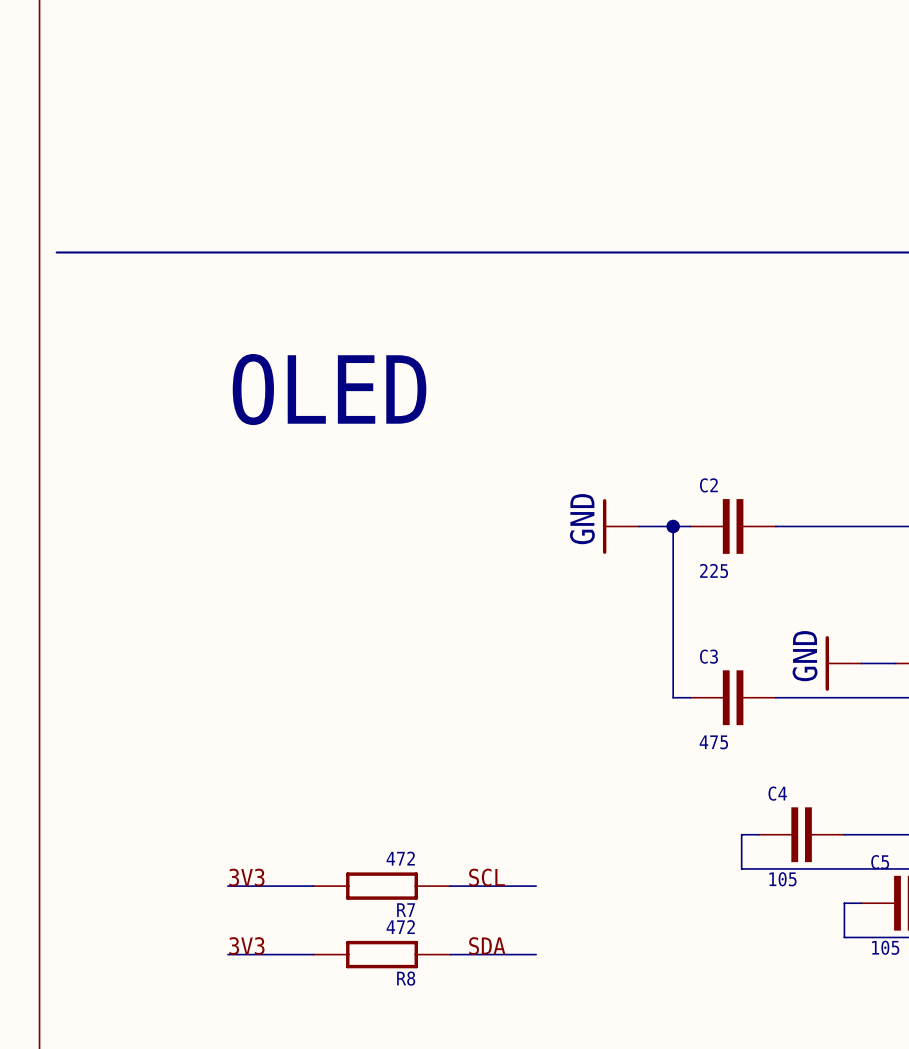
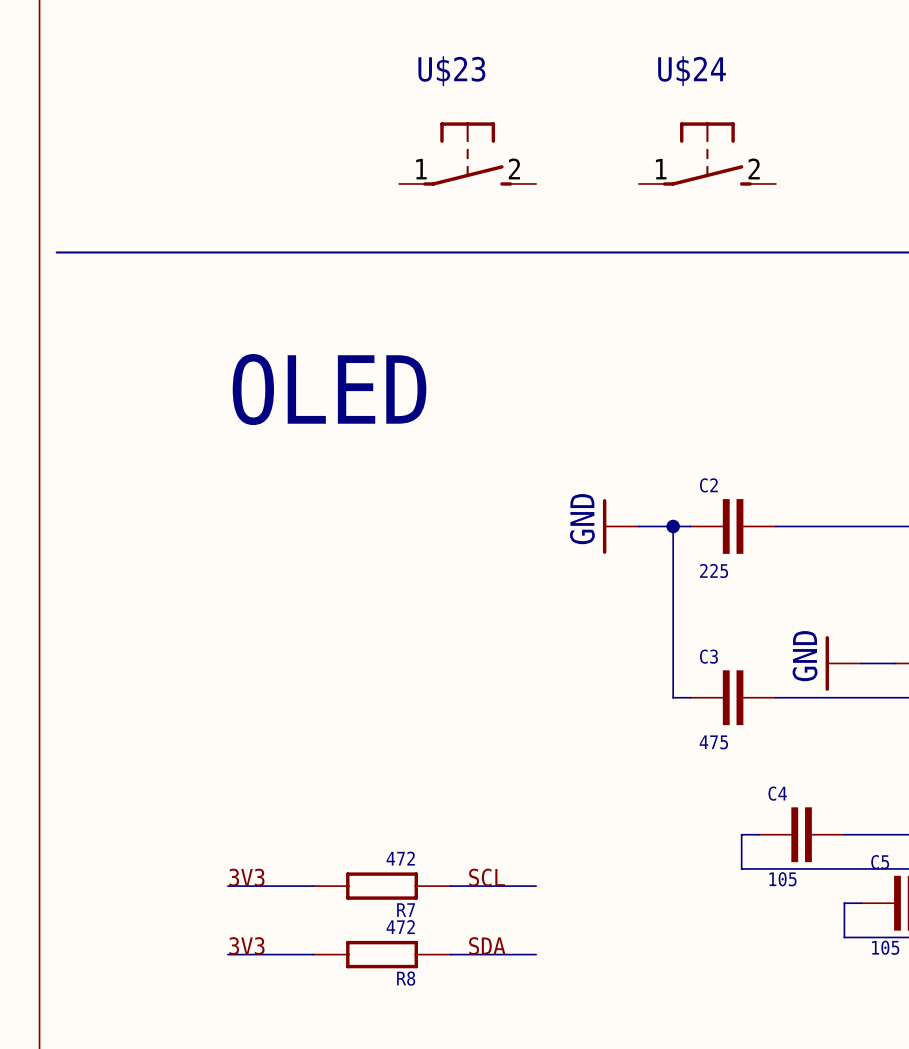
U$23: none -> (467, 154)
U$24: none -> (707, 154)

